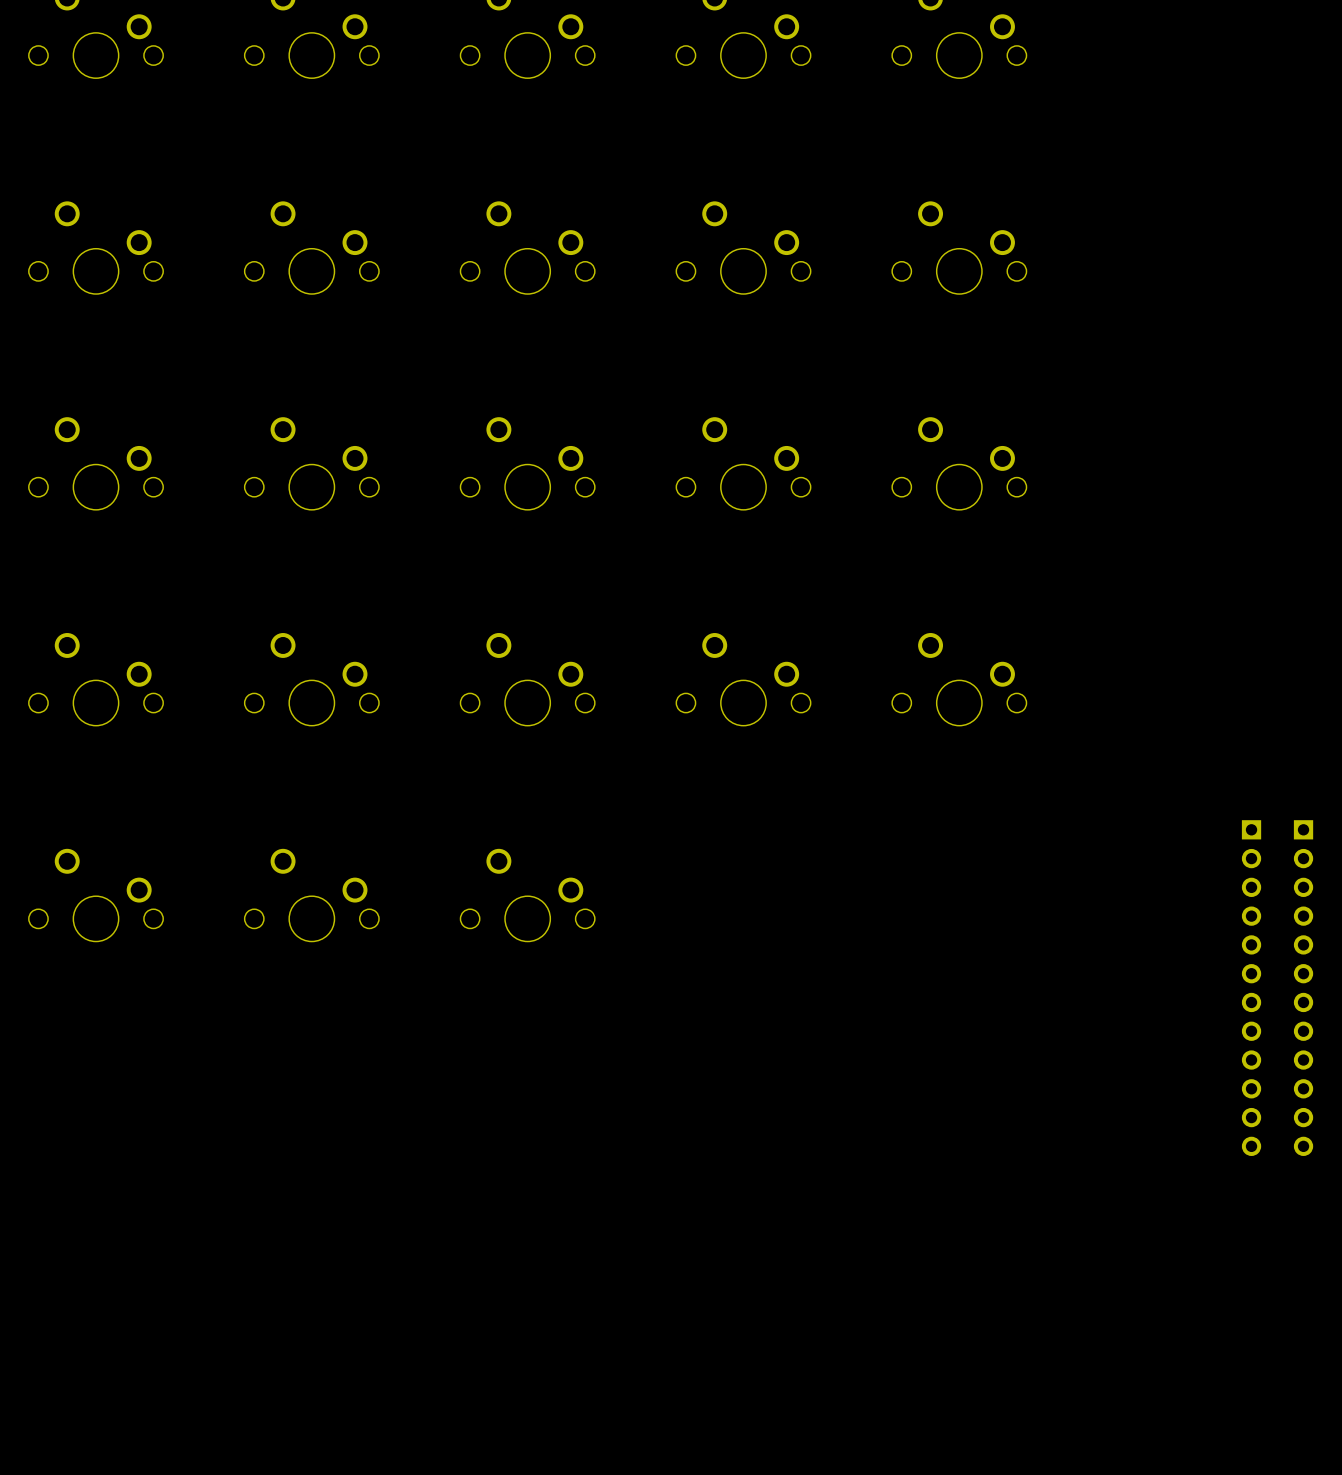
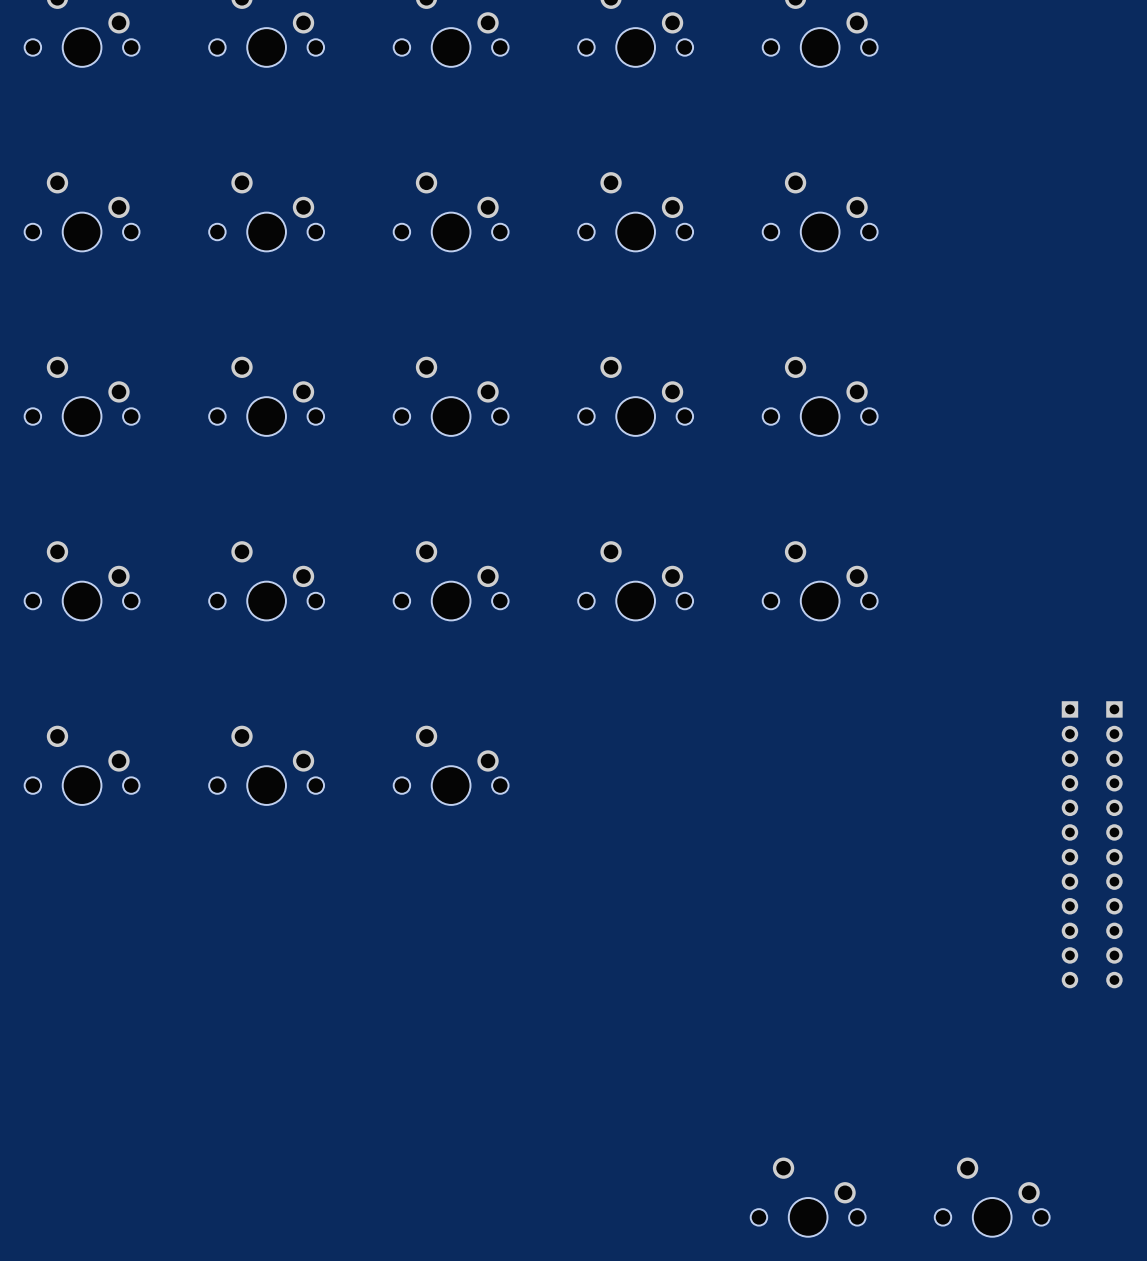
part: none -> (808, 1197)
part: none -> (992, 1197)

